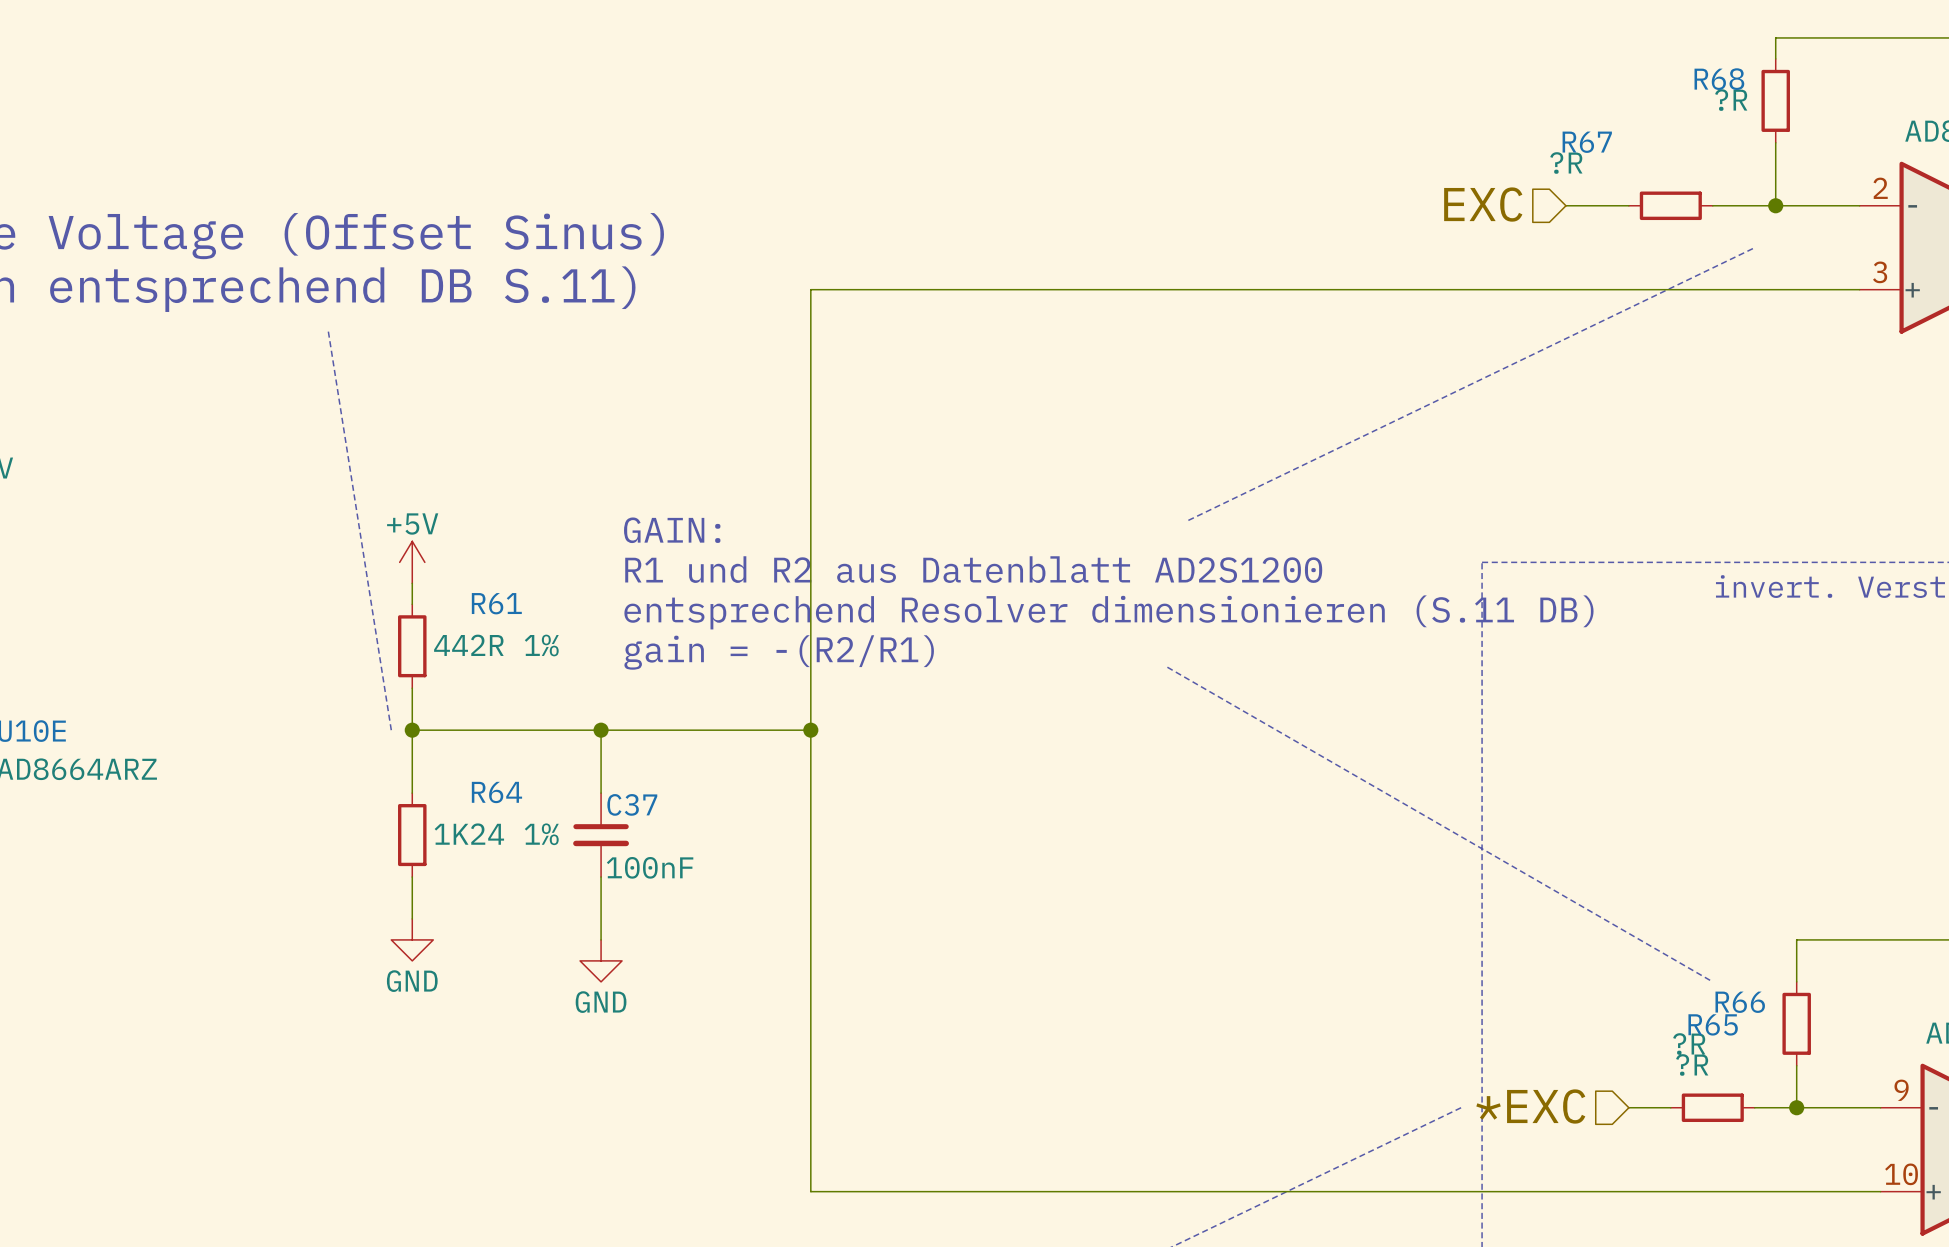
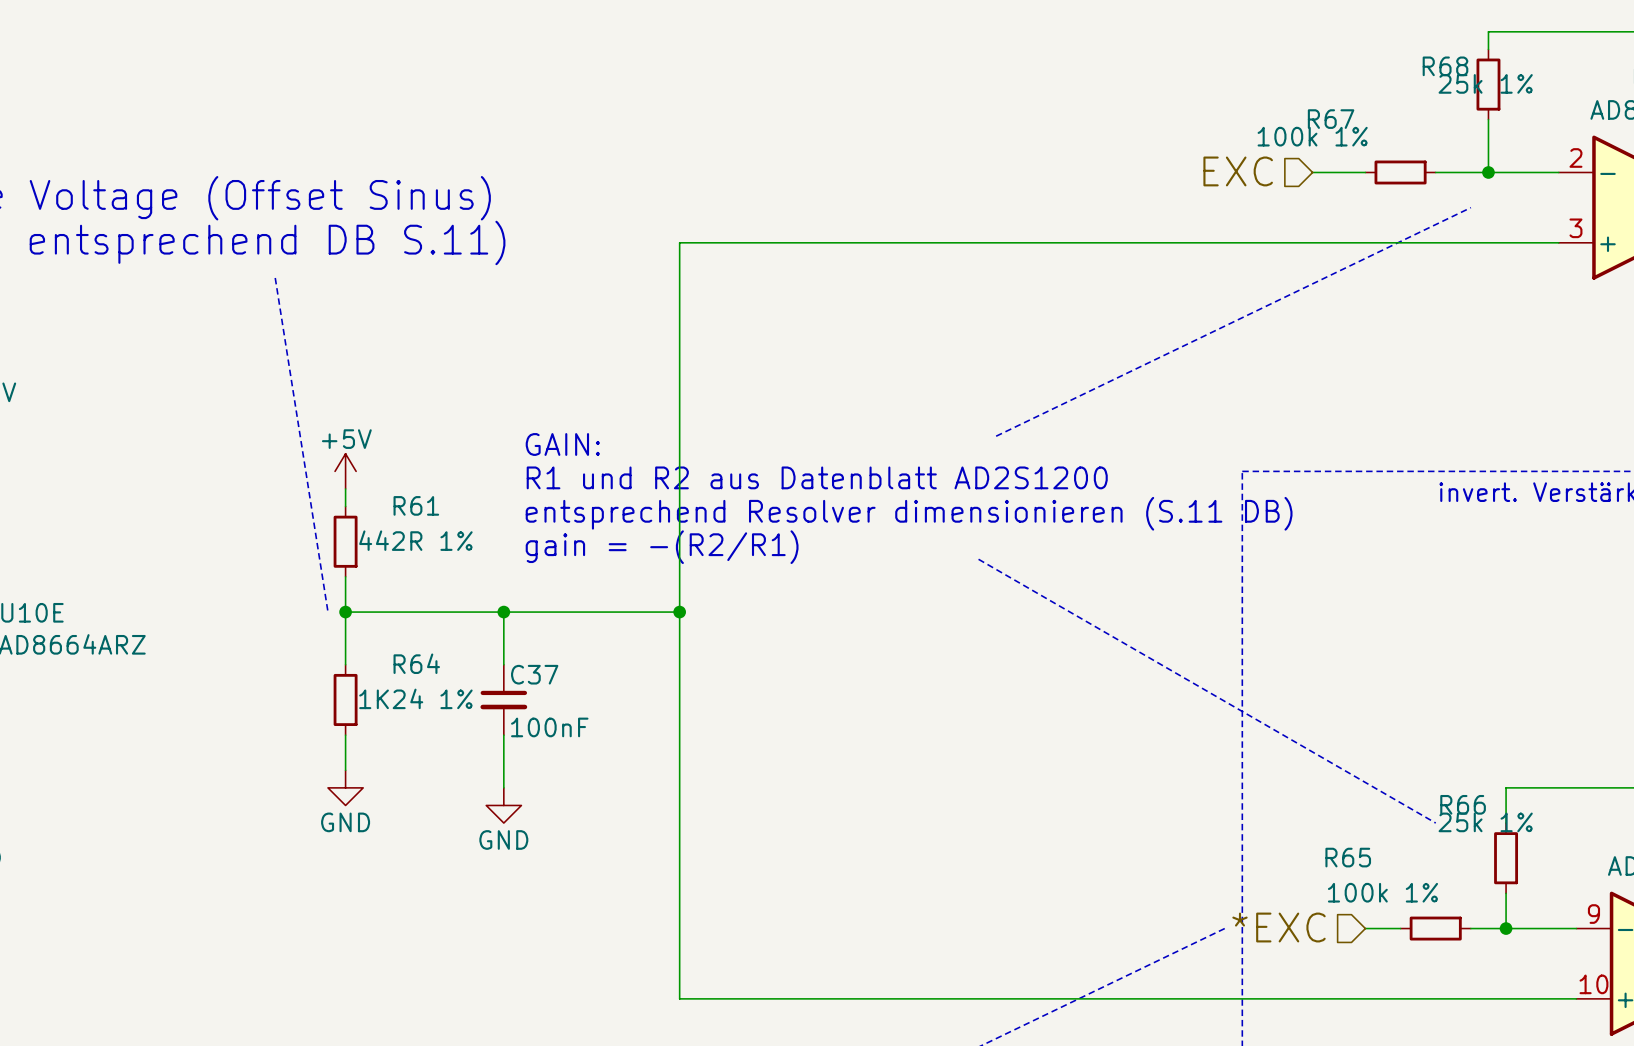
R68 value: ?R (1731, 100) -> 25k 1% (1485, 83)
R67 value: ?R (1566, 162) -> 100k 1% (1312, 136)
R66 name position: R66 (1740, 1002) -> R66 (1463, 804)
R65 name position: R65 (1713, 1024) -> R65 (1348, 857)
R66 value: ?R (1689, 1043) -> 25k 1% (1485, 822)
R65 value: ?R (1692, 1064) -> 100k 1% (1382, 892)

